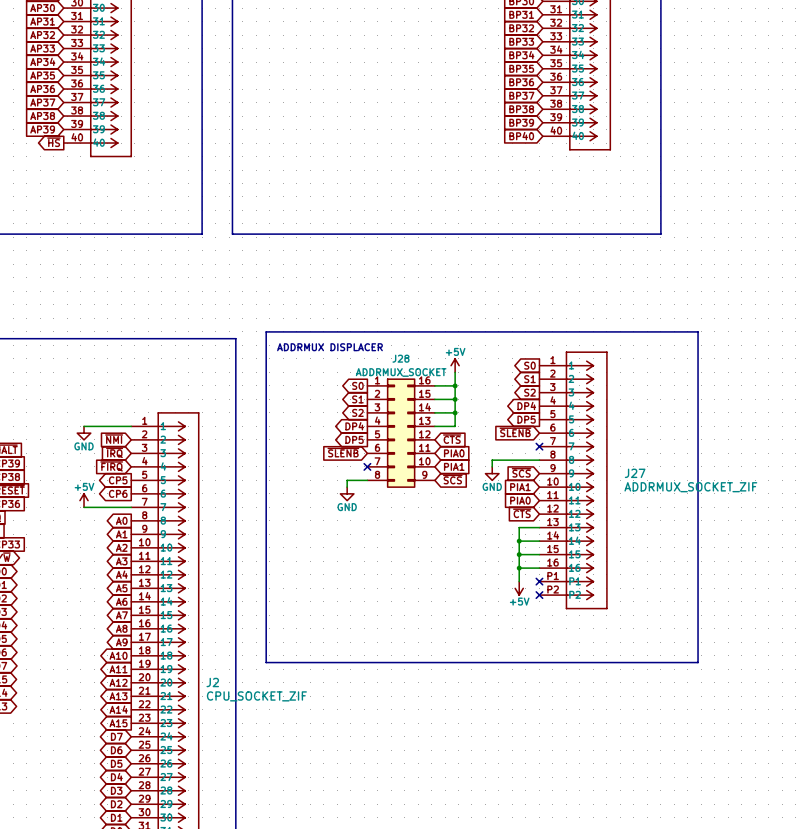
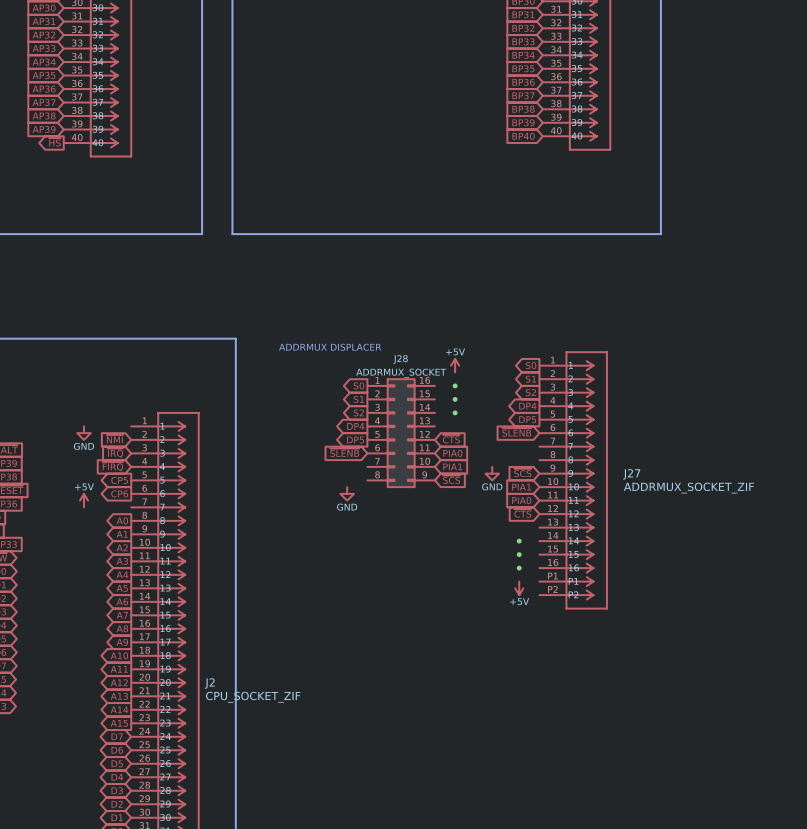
line: (266, 331) (698, 331) (698, 662) (266, 662) (266, 331) -> none
wire: (455, 372) (455, 426) (434, 426) -> none
wire: (434, 385) (455, 385) -> none
wire: (434, 399) (455, 399) -> none
wire: (434, 412) (455, 412) -> none
wire: (84, 426) (131, 426) -> none
no-connect mark: (539, 446) -> none
wire: (539, 460) (492, 460) (492, 466) -> none
no-connect mark: (367, 466) -> none
wire: (367, 480) (347, 480) (347, 487) -> none
wire: (84, 507) (131, 507) -> none
wire: (539, 527) (519, 527) (519, 581) -> none
wire: (519, 541) (539, 541) -> none
wire: (519, 554) (539, 554) -> none
wire: (519, 568) (539, 568) -> none
no-connect mark: (539, 581) -> none
no-connect mark: (539, 595) -> none

